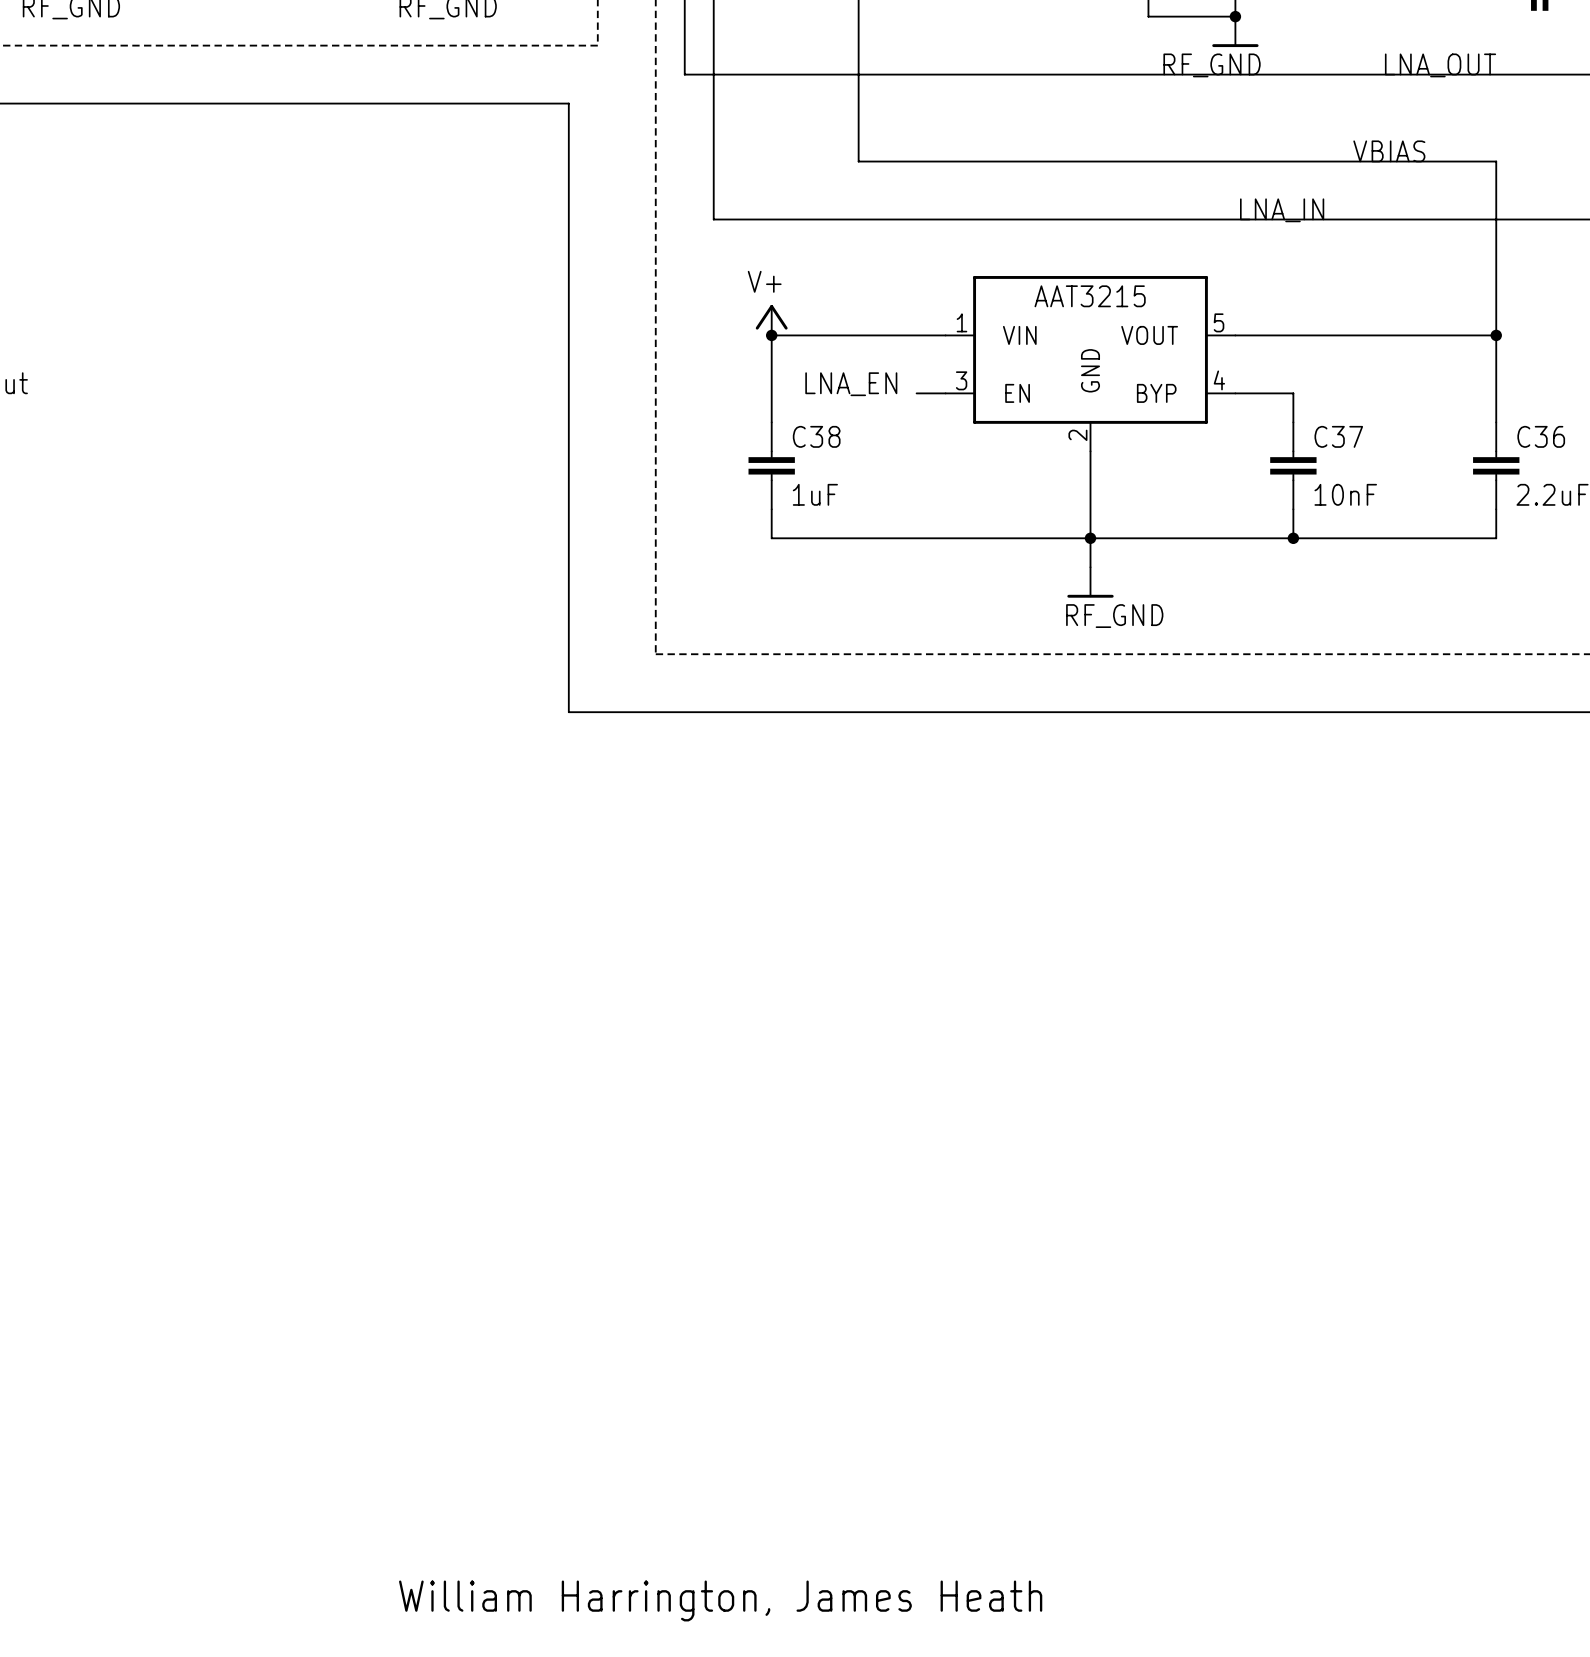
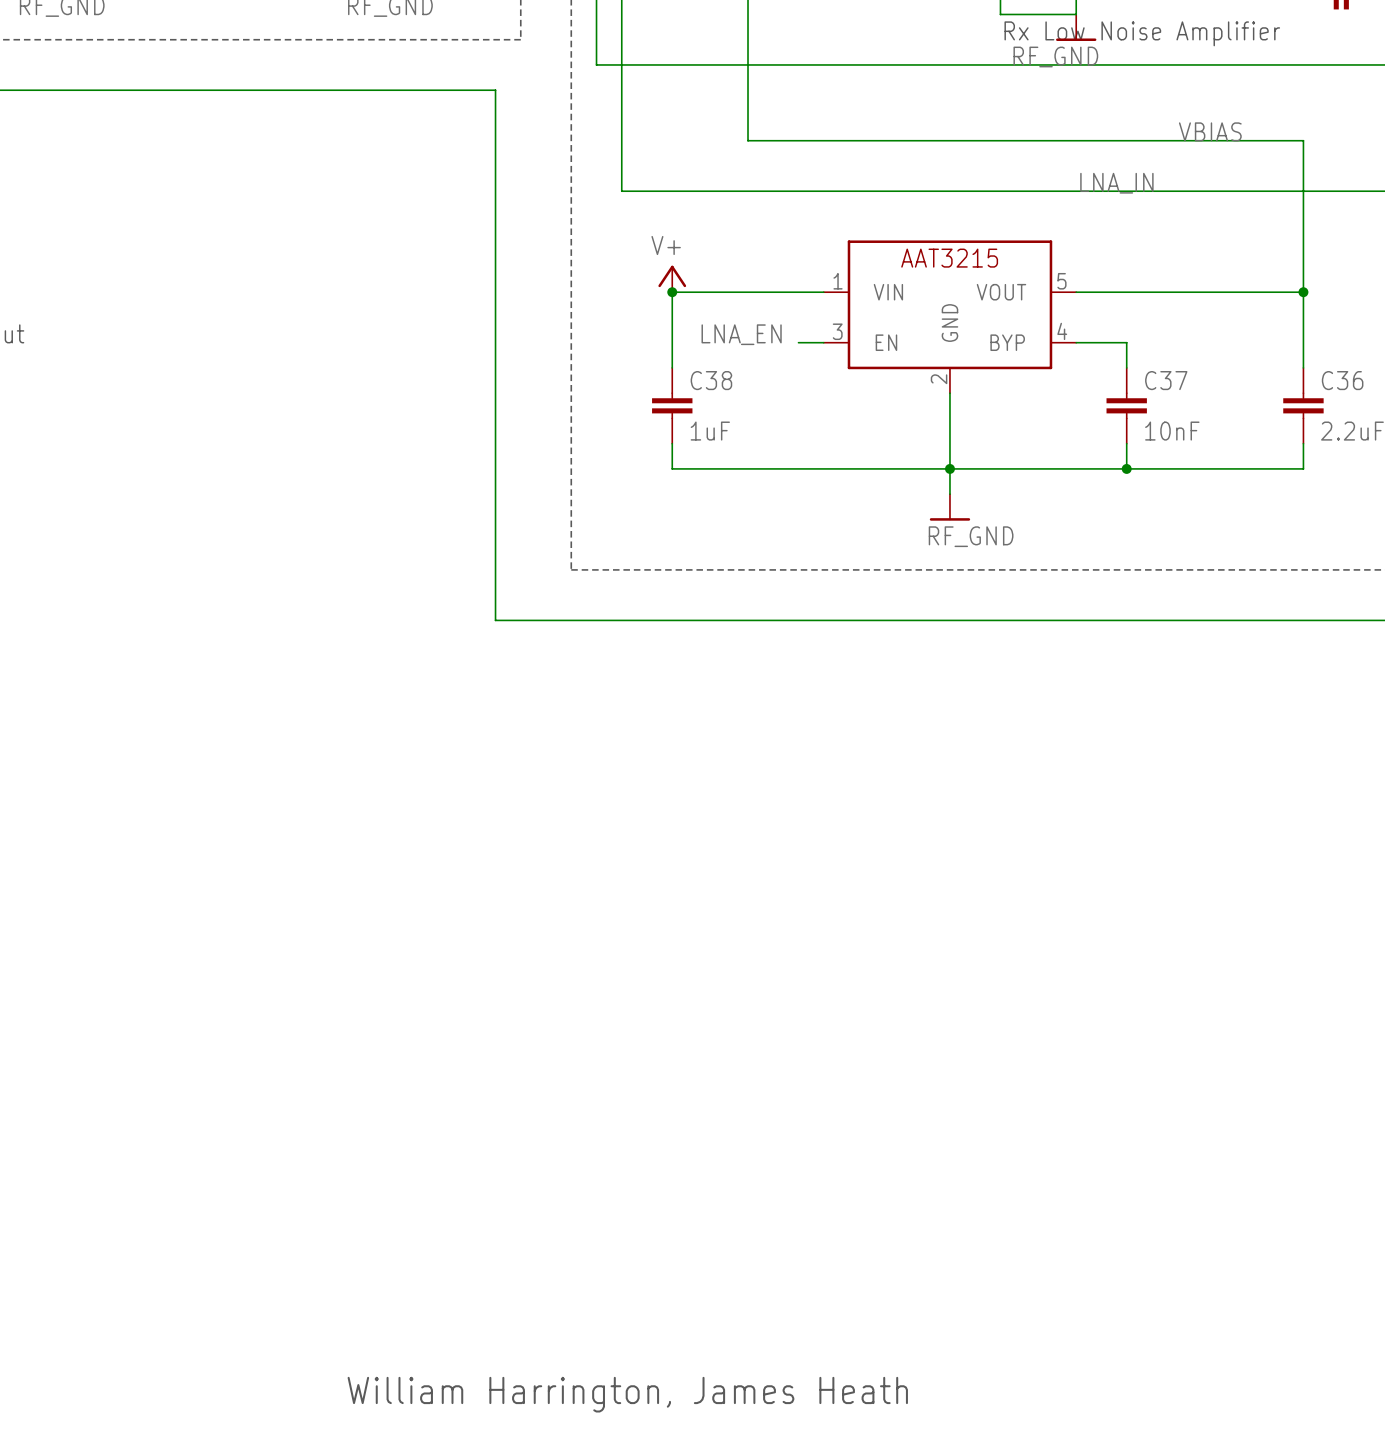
junction: (1235, 16) -> none
text: none -> Rx Low Noise Amplifier (1142, 33)
label: LNA_OUT (1440, 65) -> none

